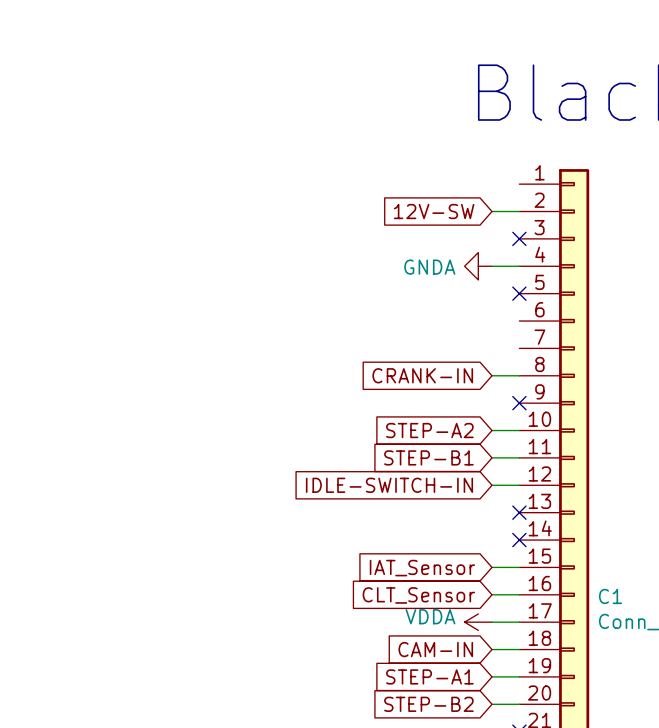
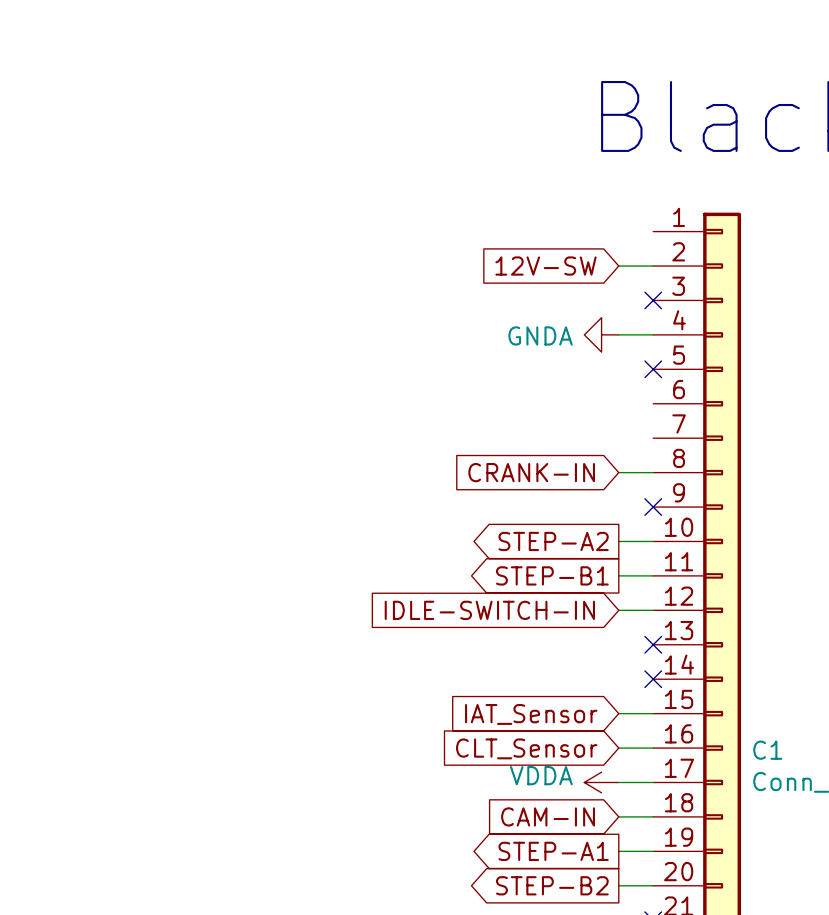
global label shape: input (429, 430) -> output (553, 541)
global label shape: input (428, 457) -> output (552, 575)
global label shape: input (429, 676) -> output (553, 851)
global label shape: input (428, 704) -> output (552, 885)

